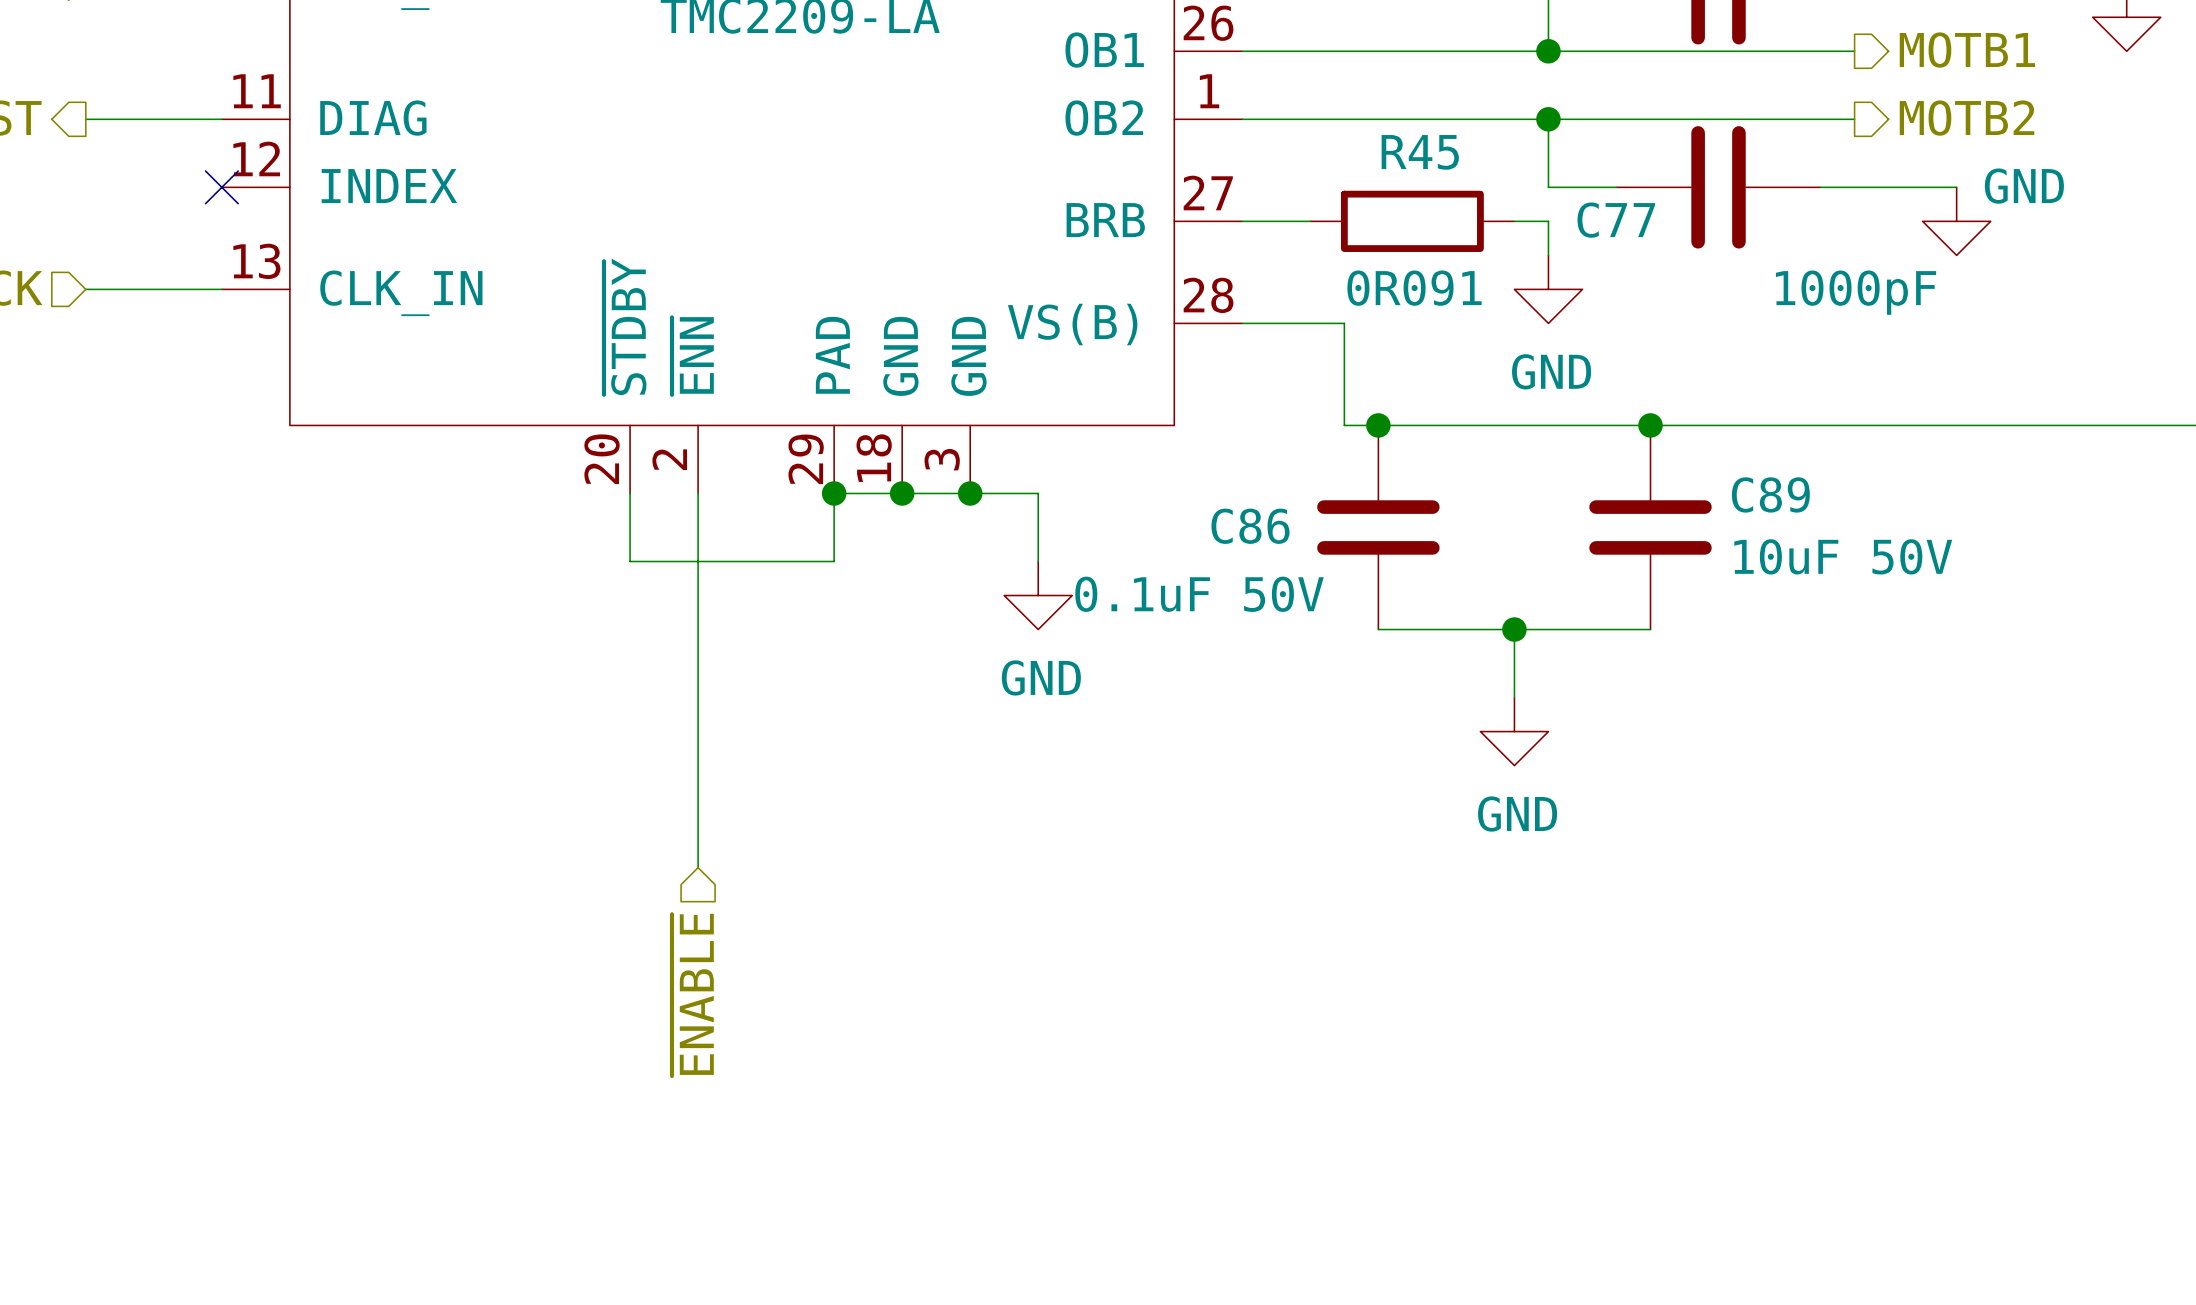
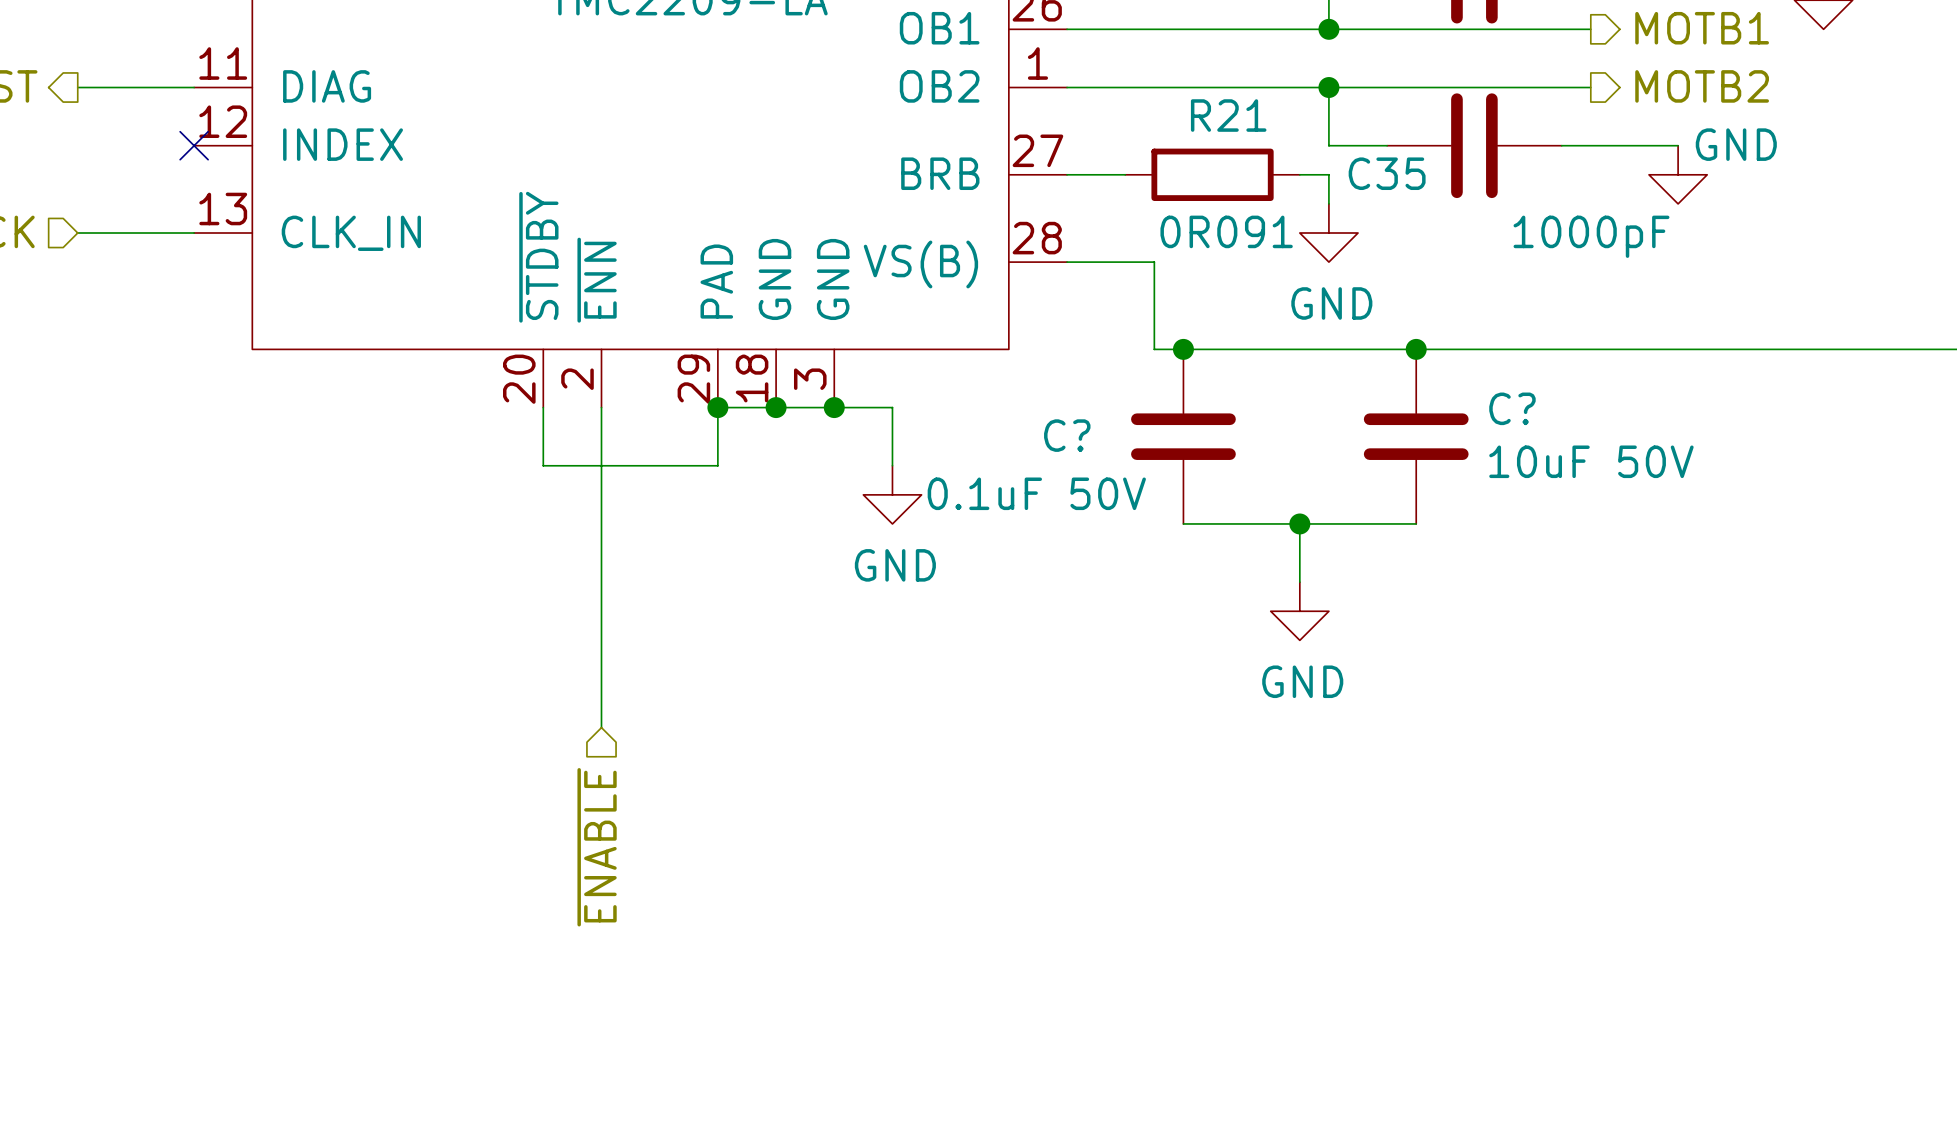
R45 name: R45 (1420, 152) -> R21 (1228, 115)
C77 name: C77 (1616, 220) -> C35 (1387, 173)
C89 name: C89 (1770, 494) -> C? (1512, 408)
C86 name: C86 (1250, 526) -> C? (1067, 435)

